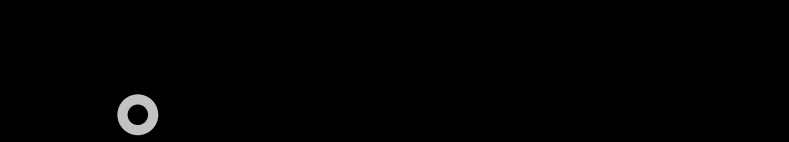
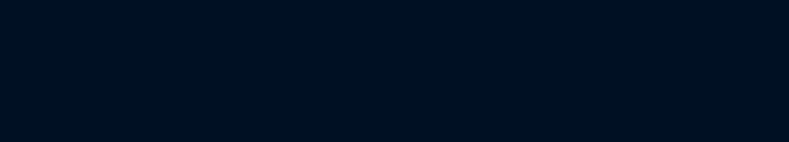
via: (137, 114) -> none

